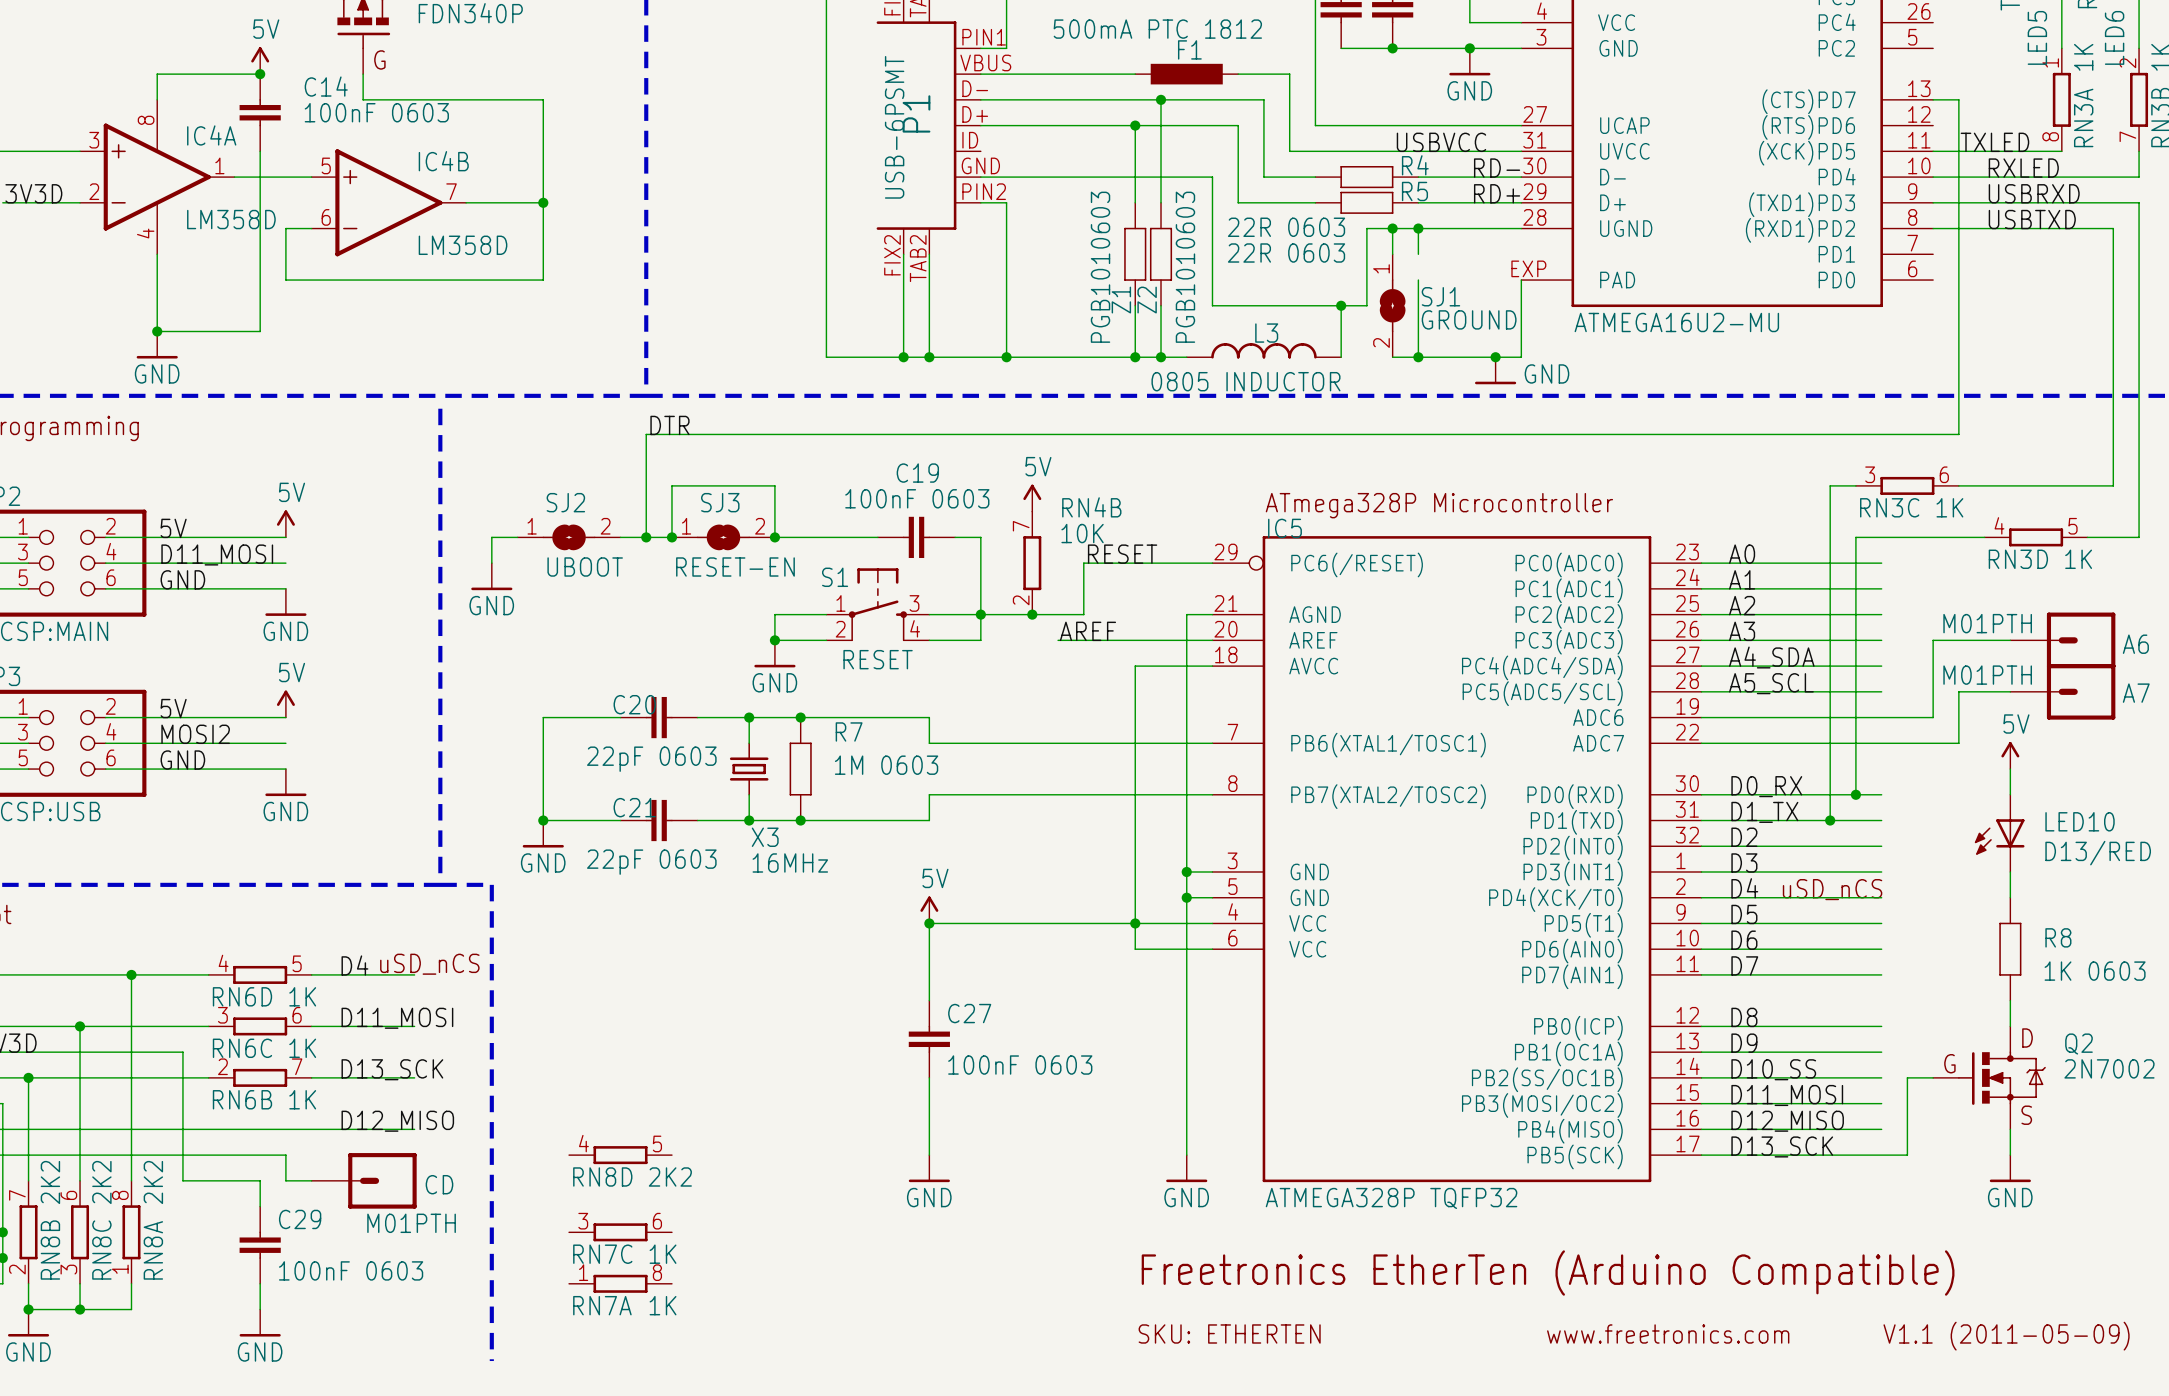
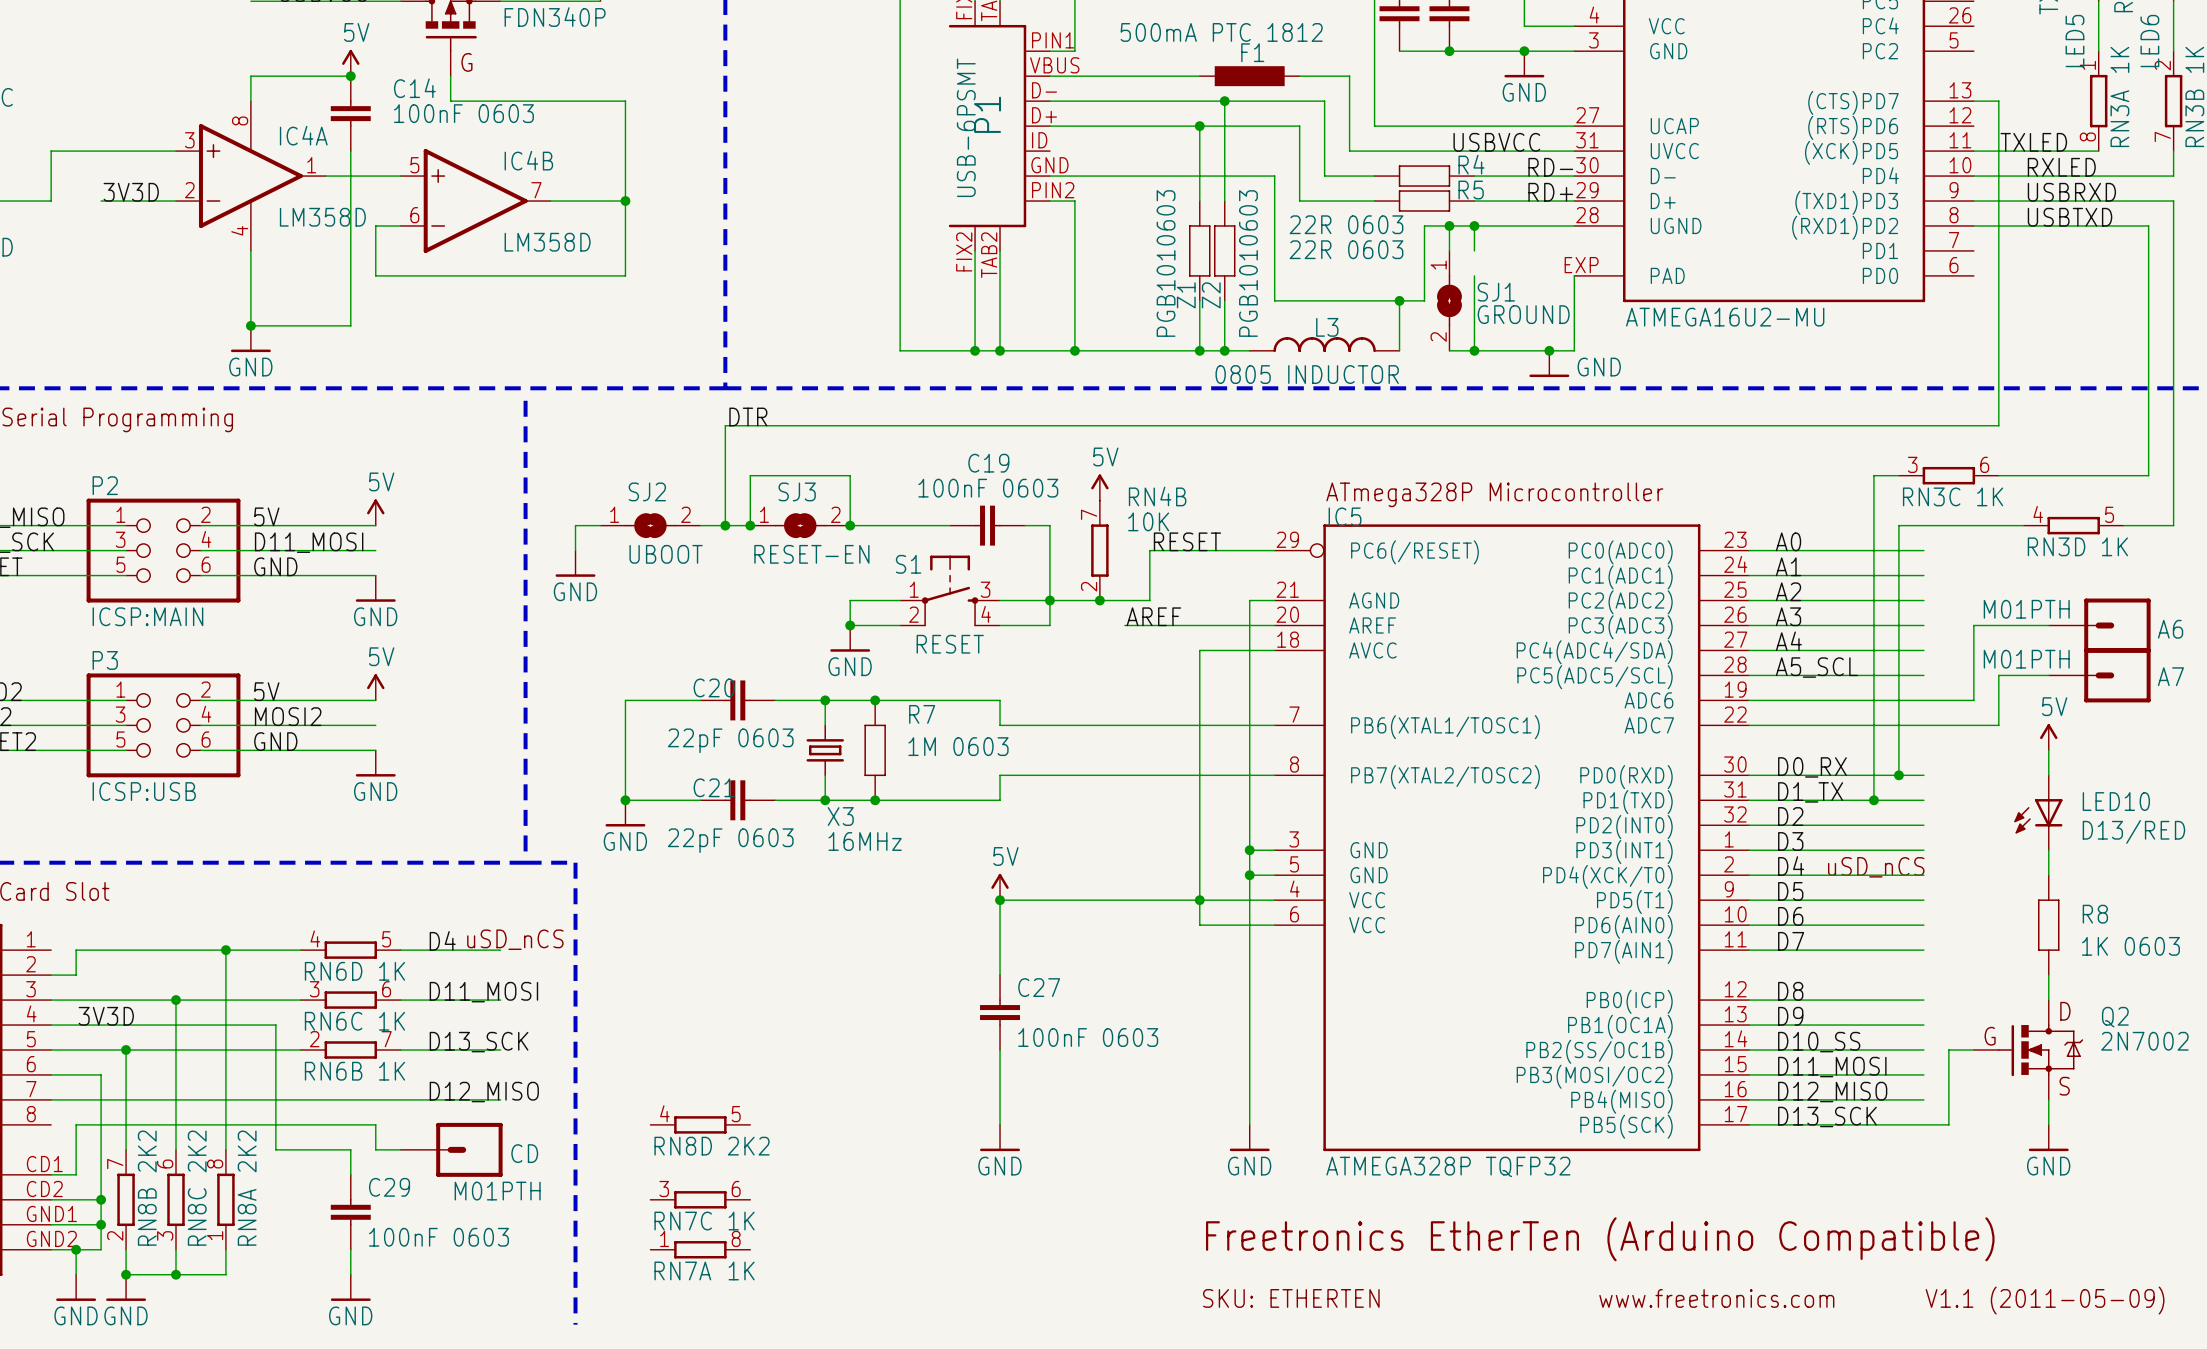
label: A4_SDA (1771, 657) -> A4 (1788, 641)

